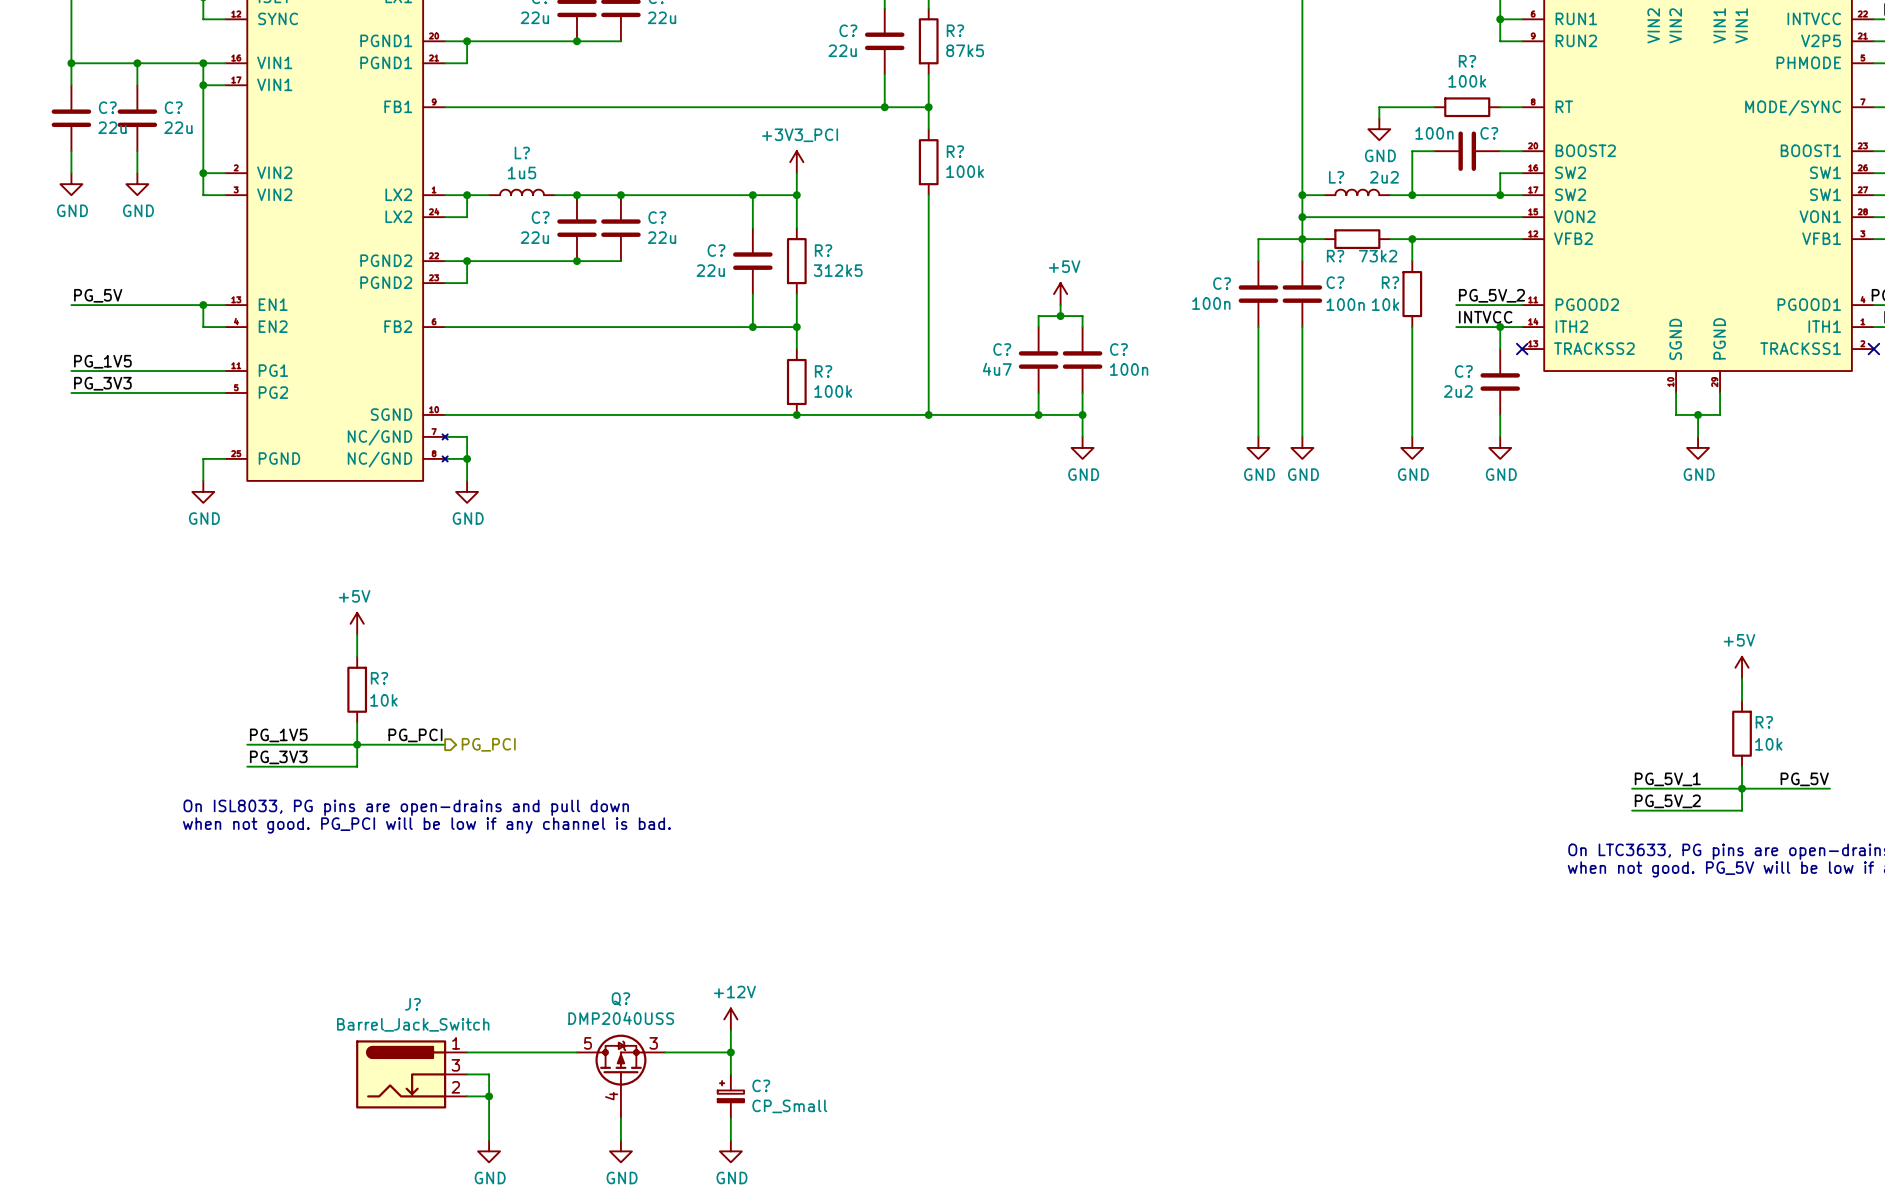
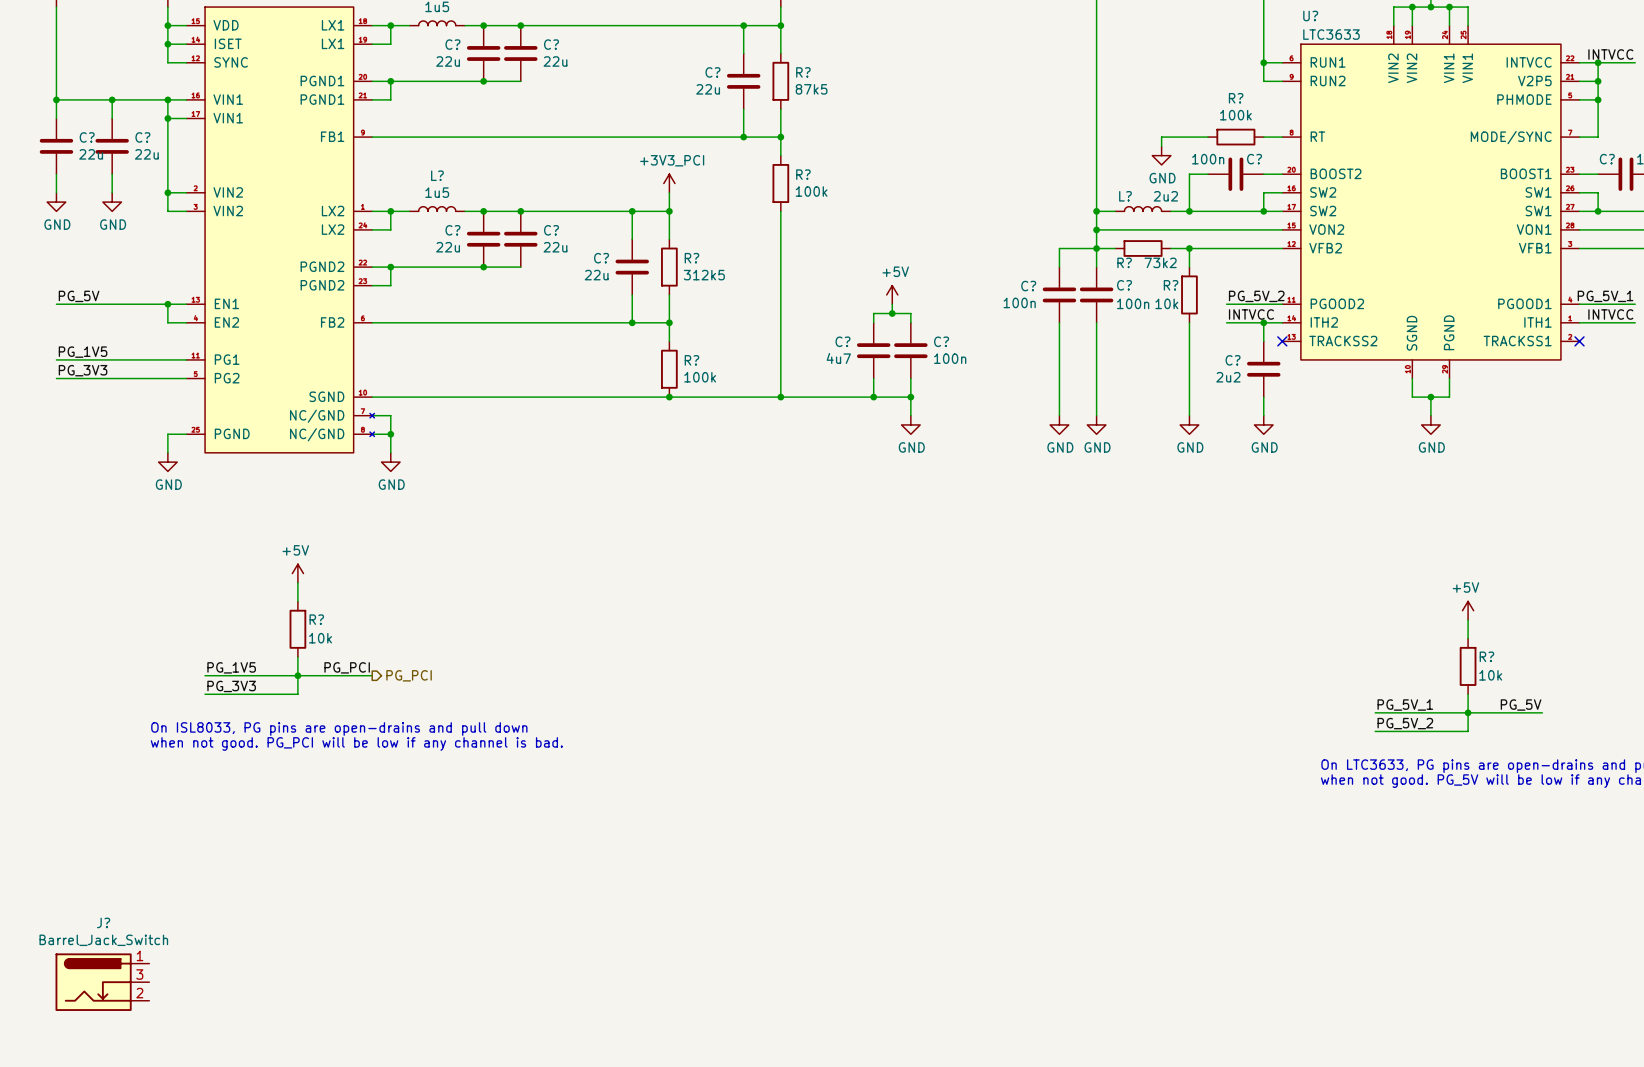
power symbol: +12V (730, 1019) -> none
wire: (730, 1030) (730, 1074) -> none
wire: (467, 1052) (576, 1052) -> none
wire: (664, 1052) (730, 1052) -> none
junction: (730, 1052) -> none
J?: Barrel_Jack_Switch (411, 1074) -> none
wire: (467, 1074) (489, 1074) (489, 1140) -> none
Q?: DMP2040USS (620, 1076) -> none
wire: (467, 1096) (489, 1096) -> none
junction: (489, 1096) -> none
C?: CP_Small (730, 1096) -> none
J?: none -> Barrel_Jack_Switch (102, 982)
wire: (620, 1118) (620, 1140) -> none
wire: (730, 1118) (730, 1140) -> none
power symbol: GND (489, 1151) -> none
power symbol: GND (620, 1151) -> none
power symbol: GND (730, 1151) -> none

